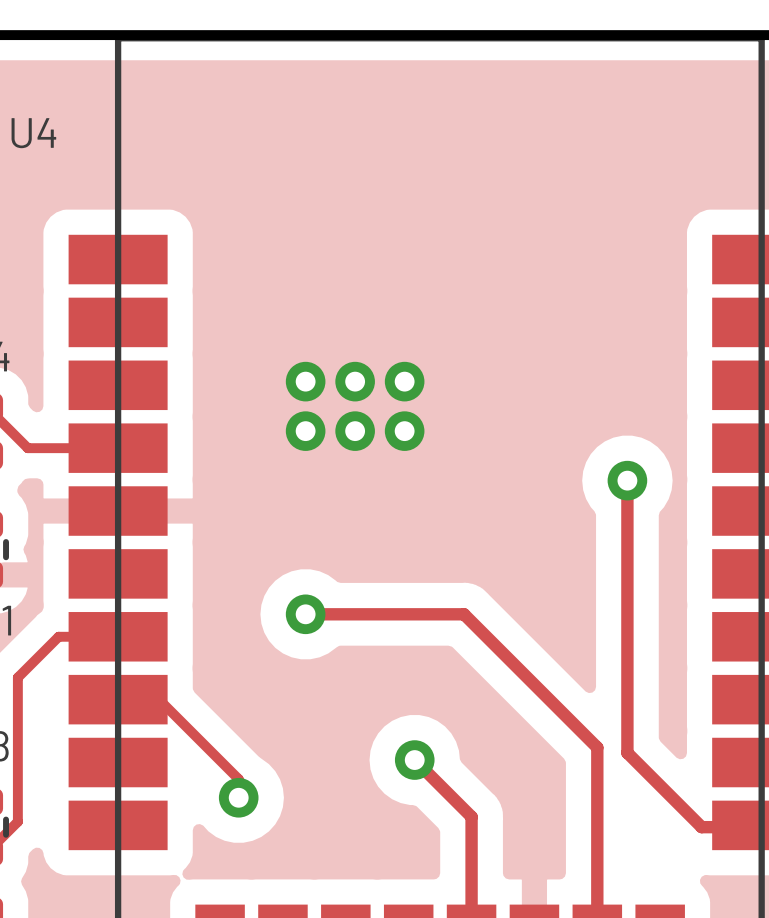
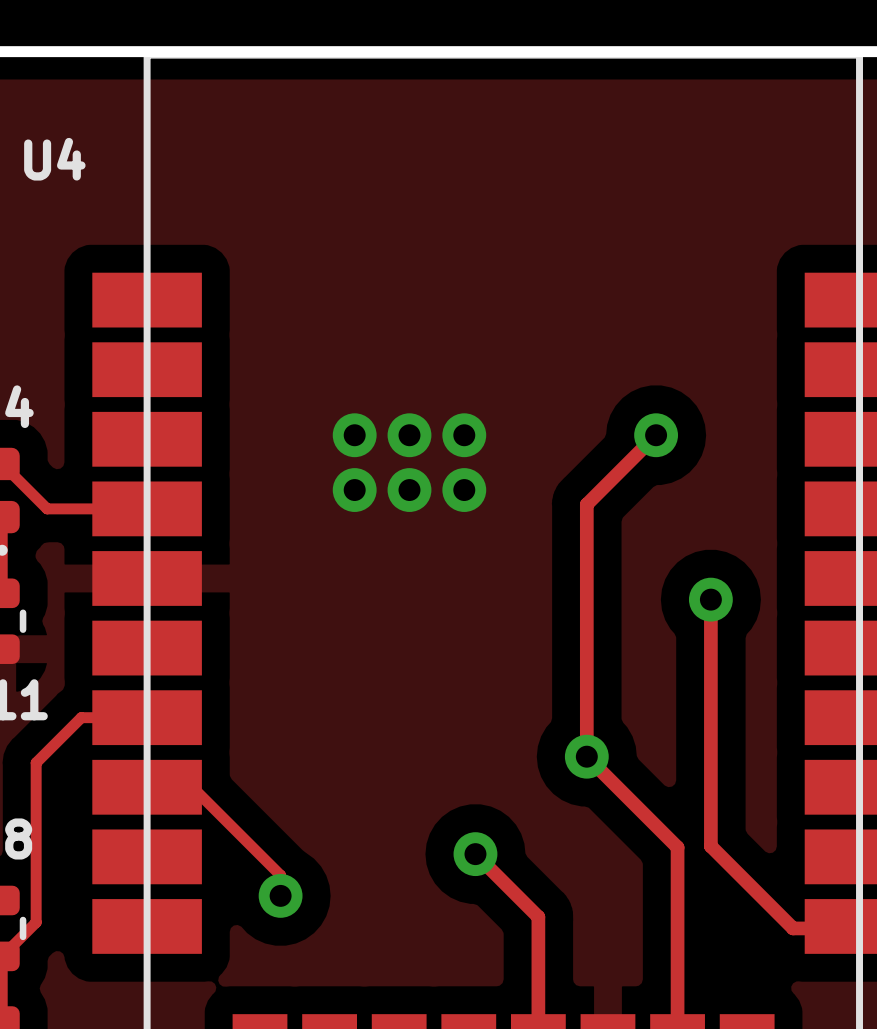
via: none -> (656, 435)
track: (627, 480) (627, 530) -> none
via position: (627, 480) -> (710, 599)
track: (305, 614) (464, 614) (597, 747) (597, 754) -> (656, 435) (586, 504) (586, 756) (677, 847)
via: (305, 614) -> none
via: none -> (586, 756)

